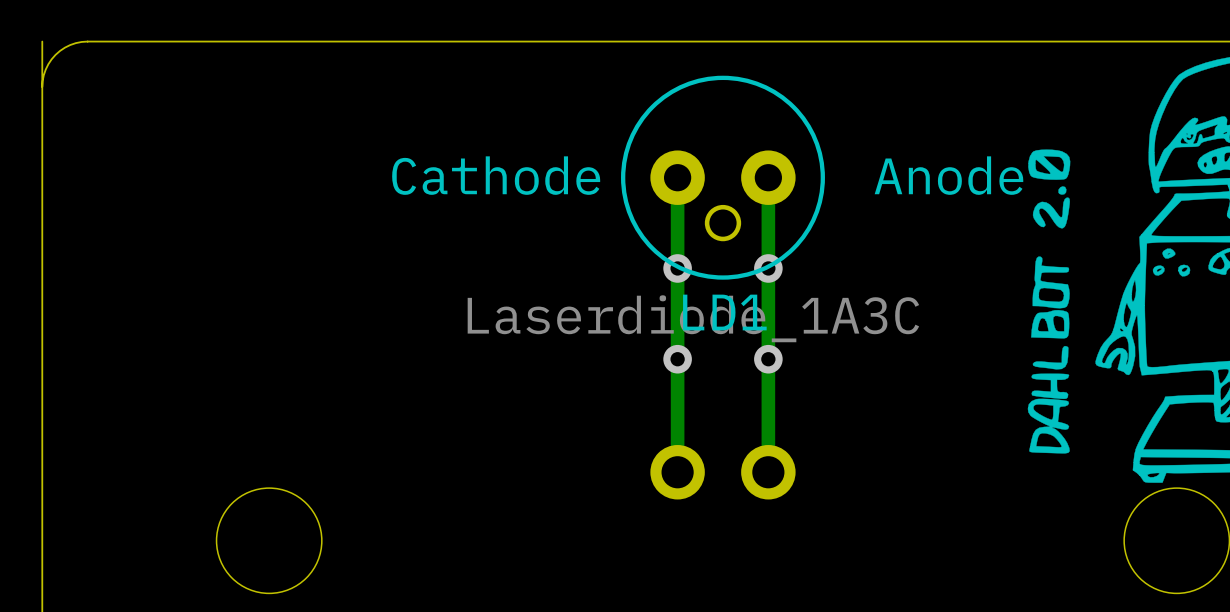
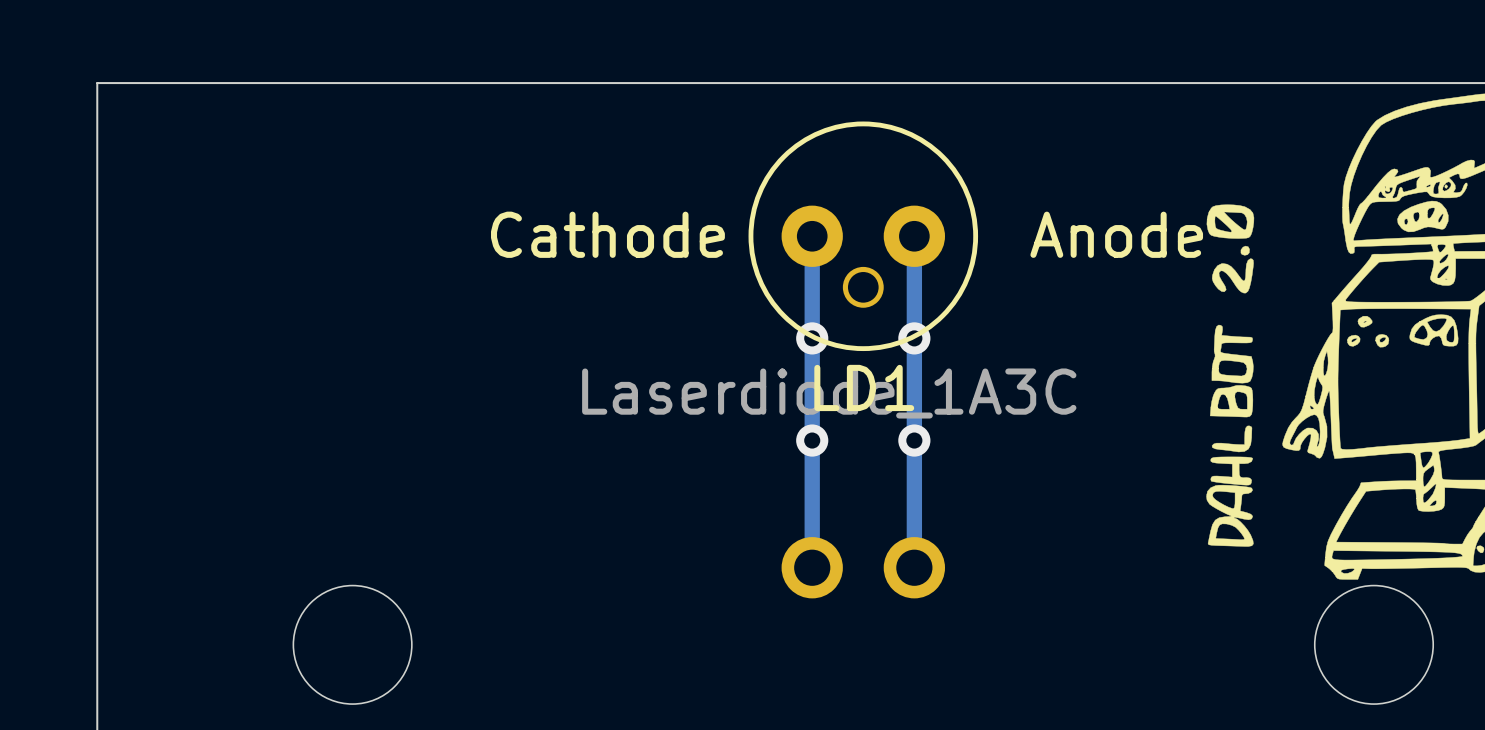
board edge: (87, 41) (70, 45) (55, 54) (45, 69) (42, 86) -> (148, 83) (97, 83)

